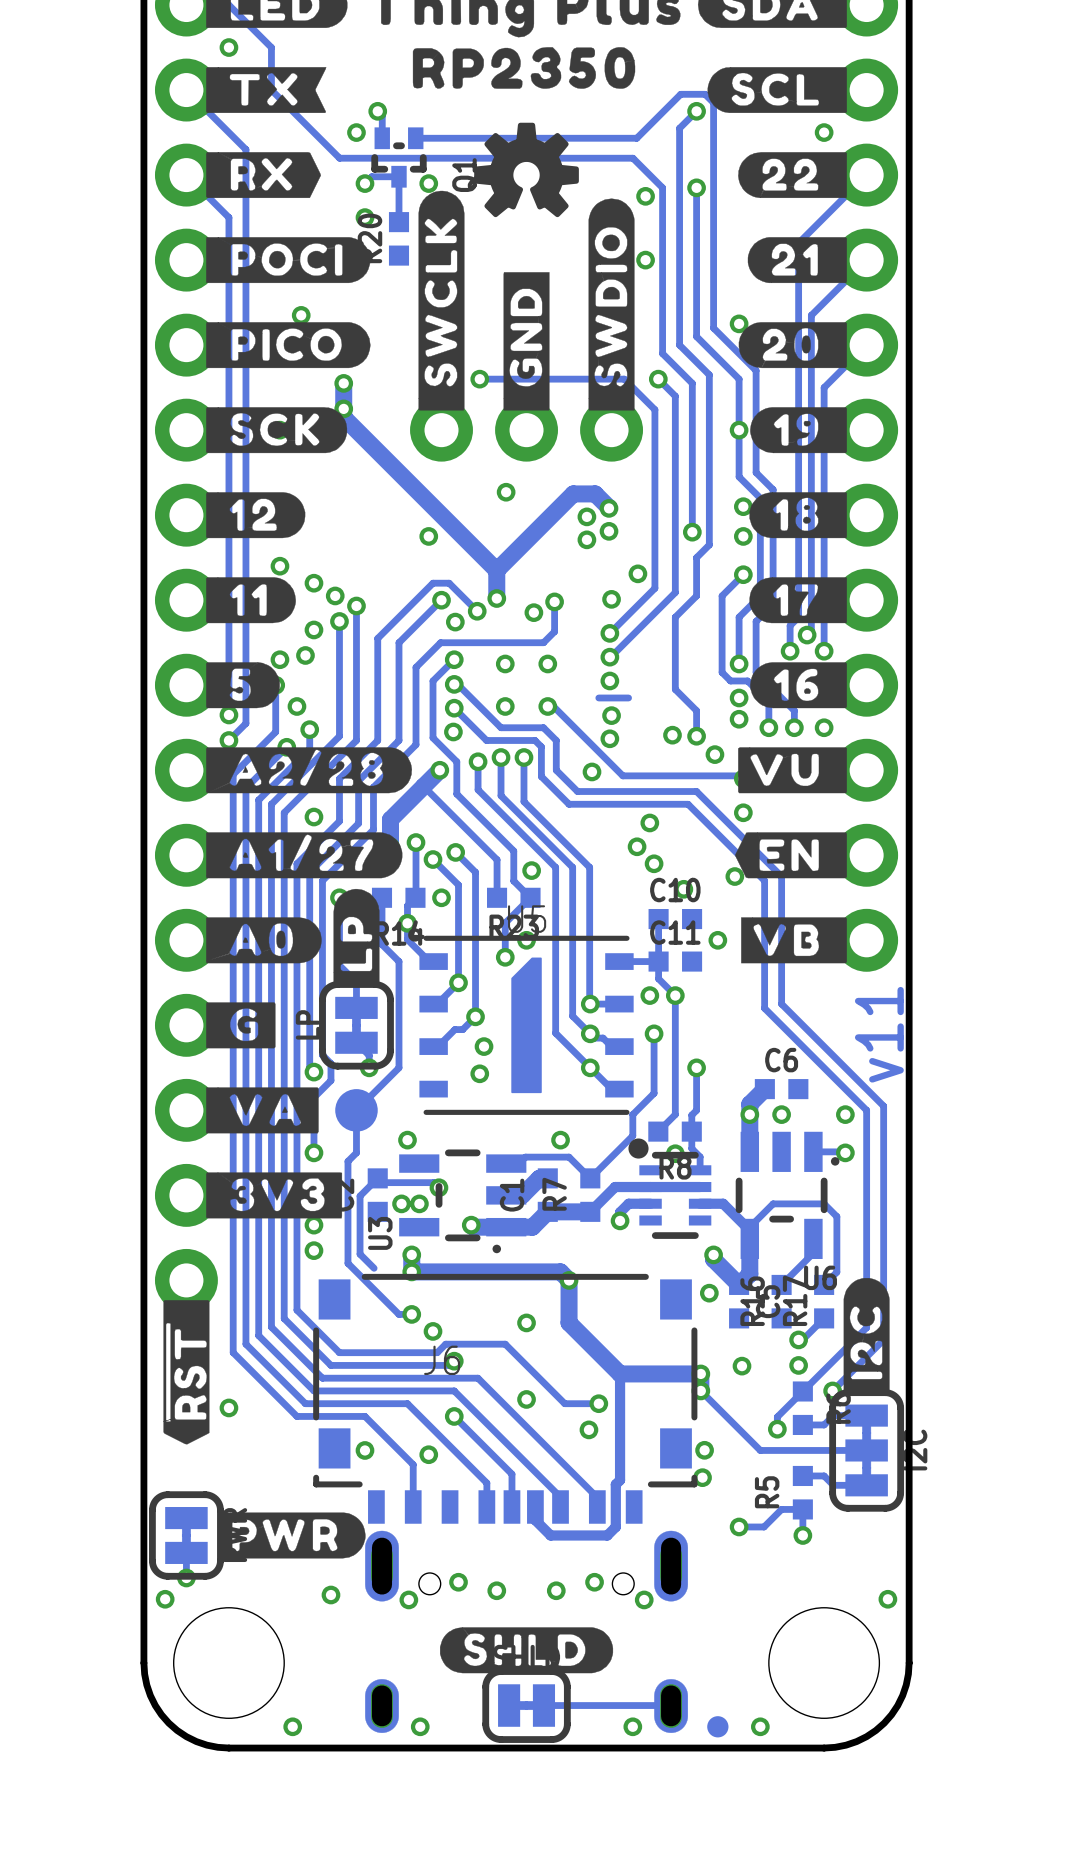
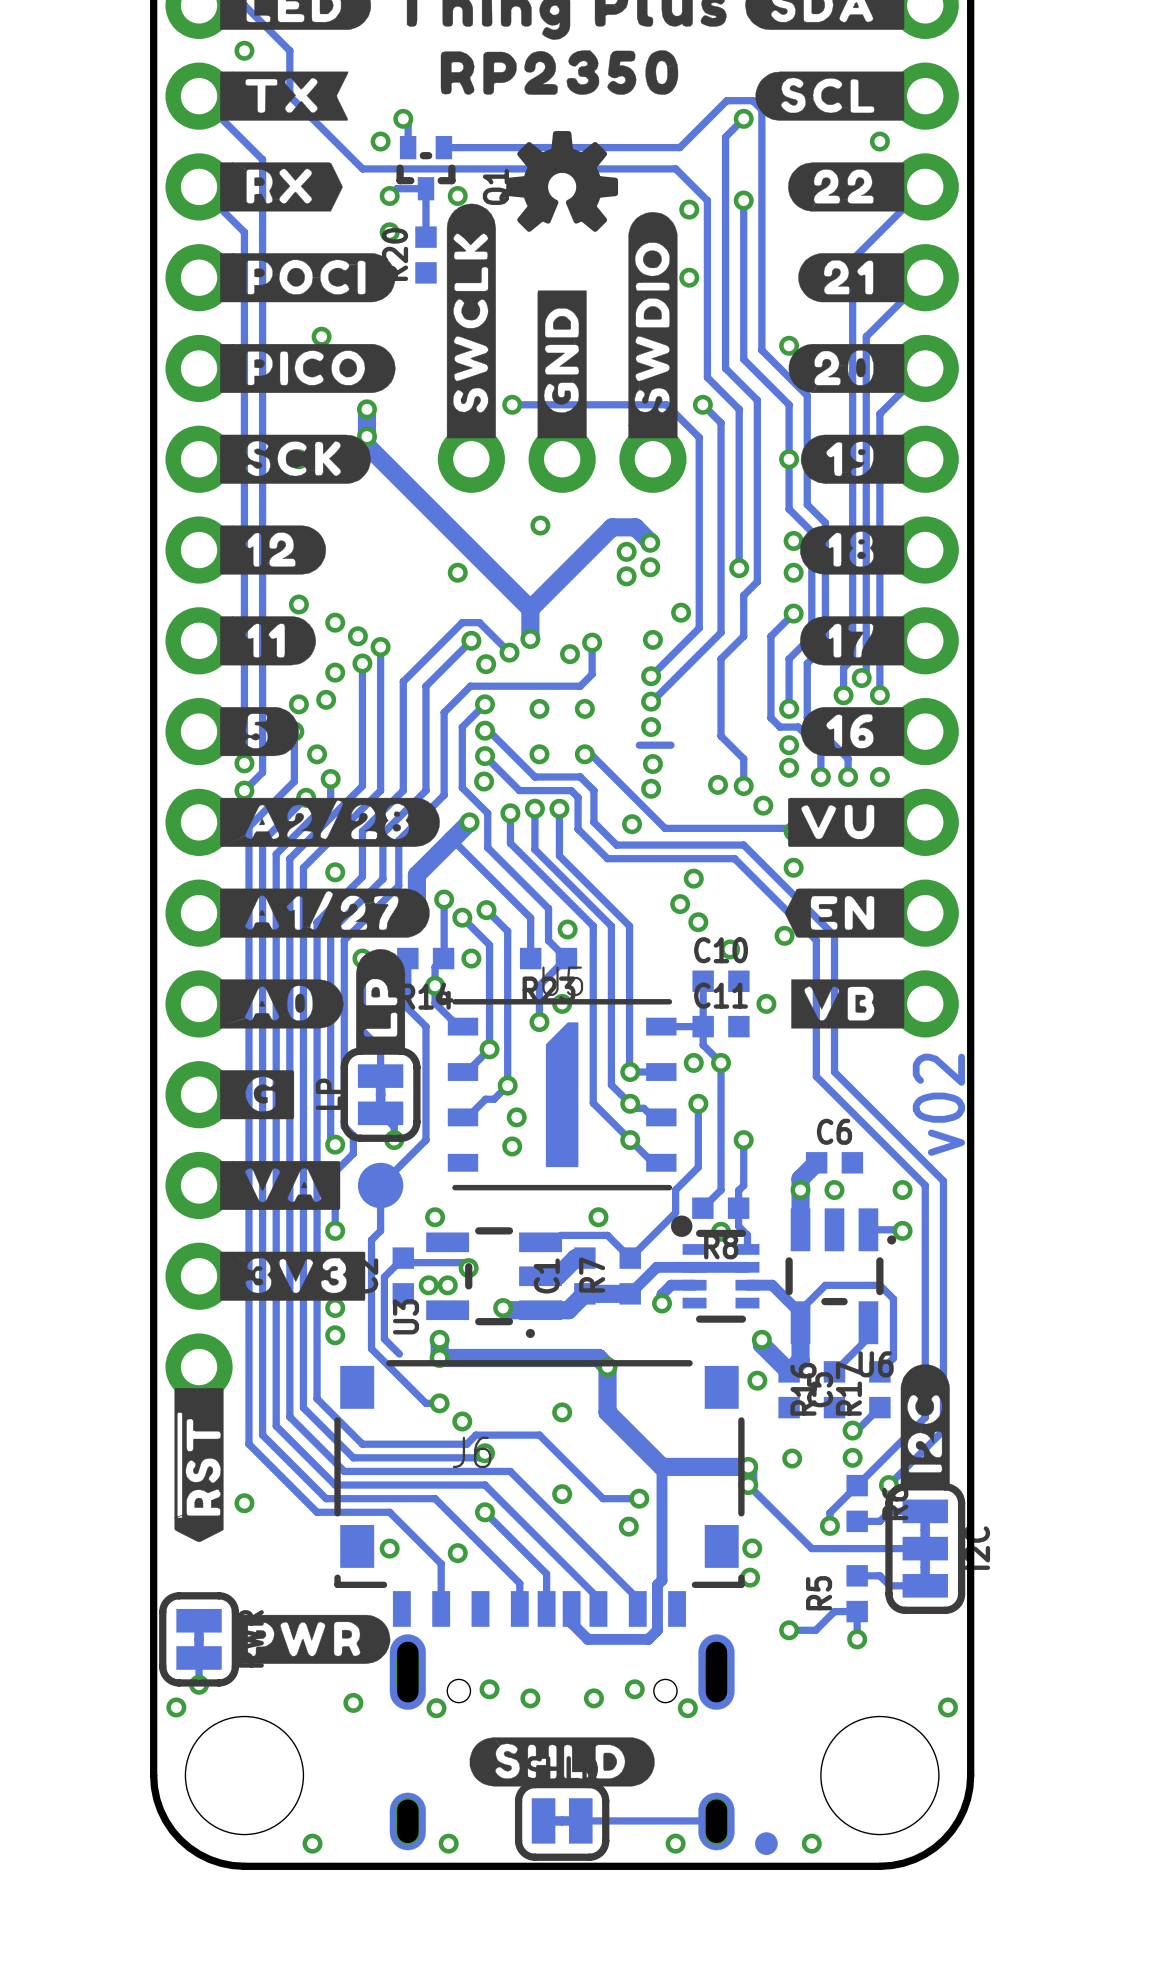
text: v11 (879, 1034) -> v02 (938, 1104)

